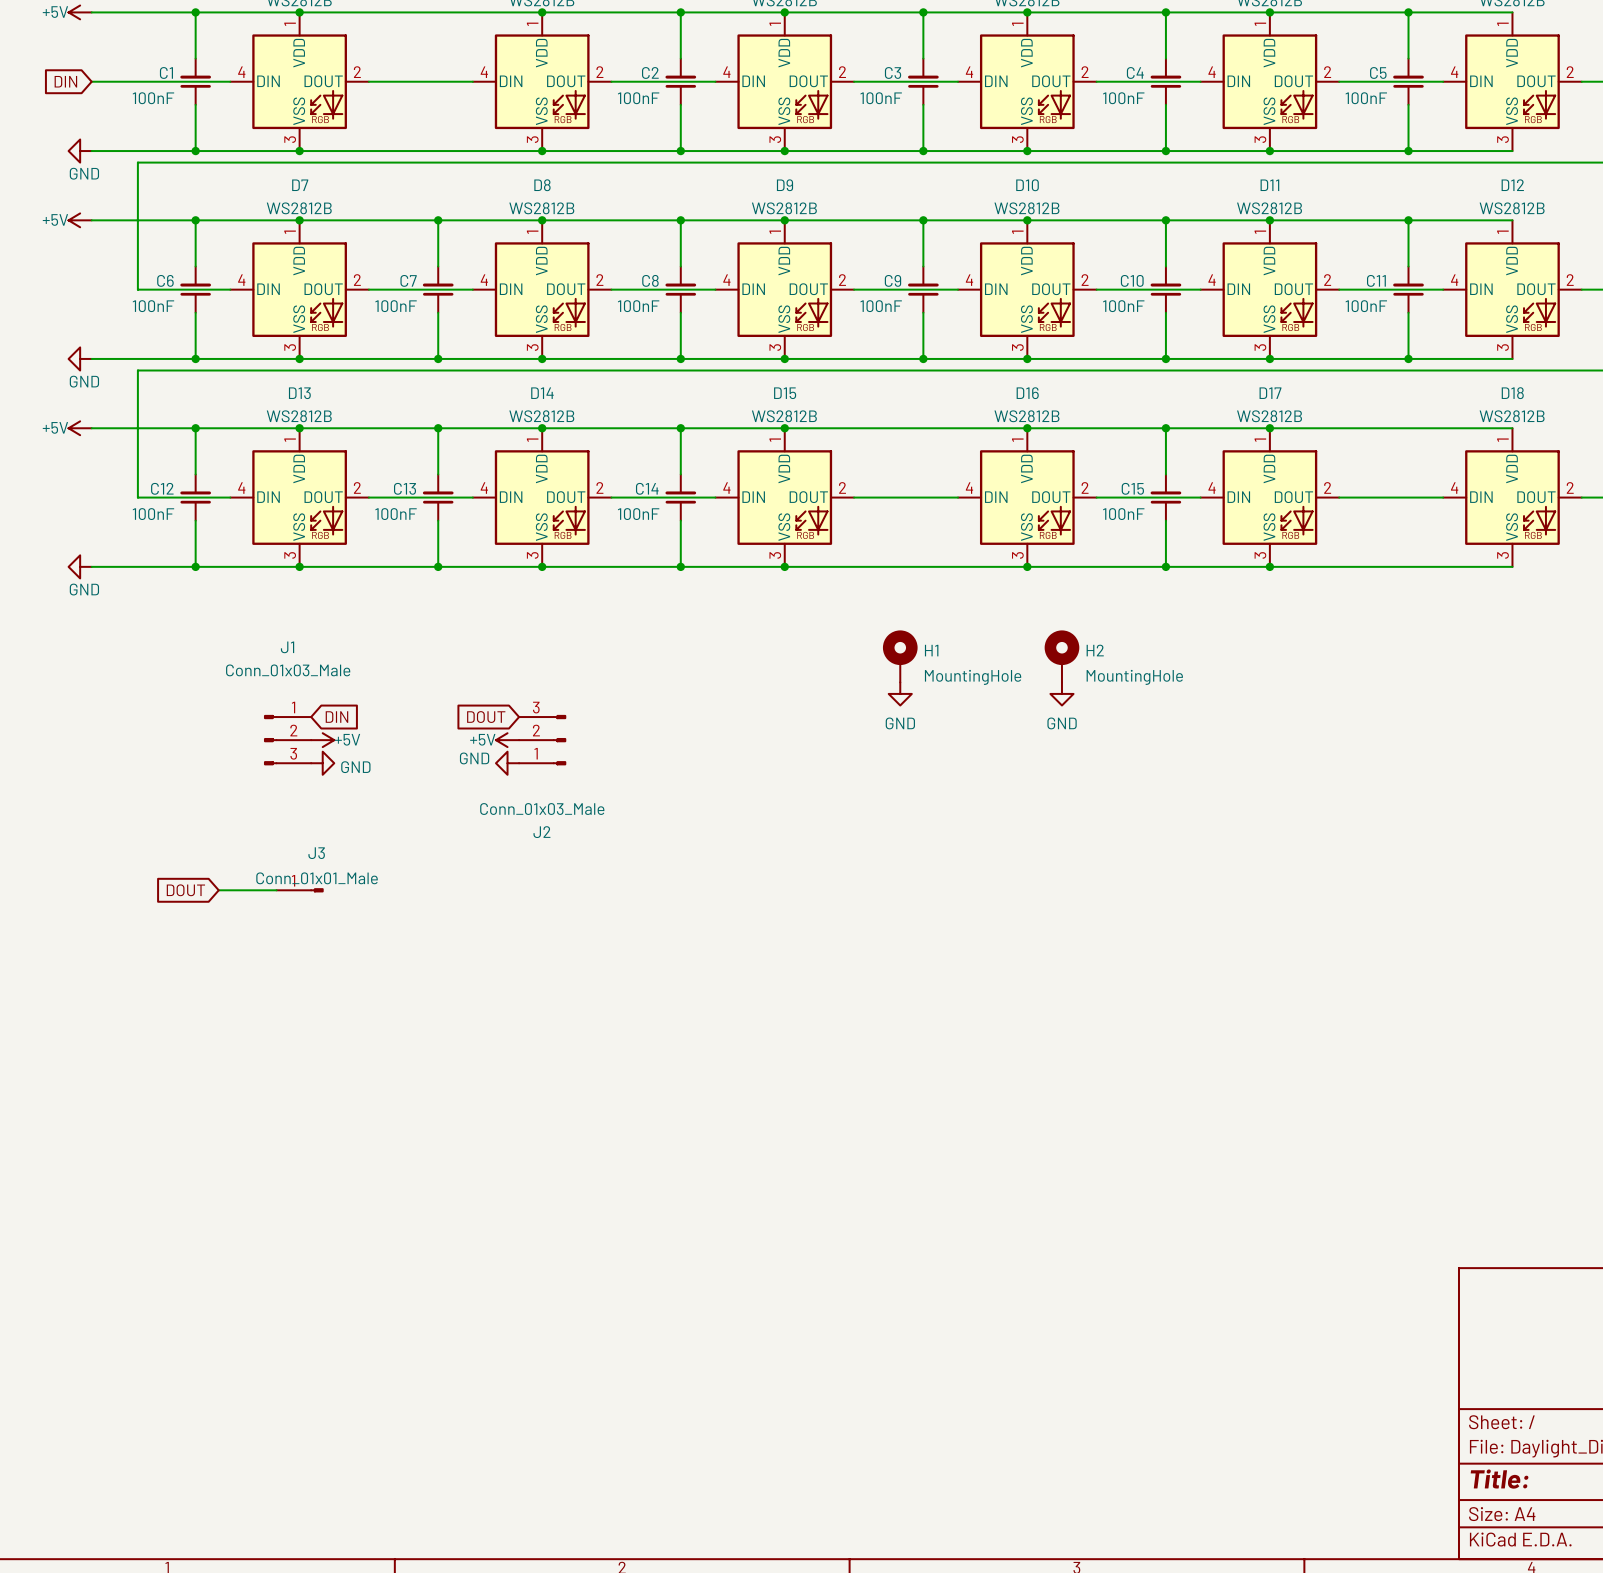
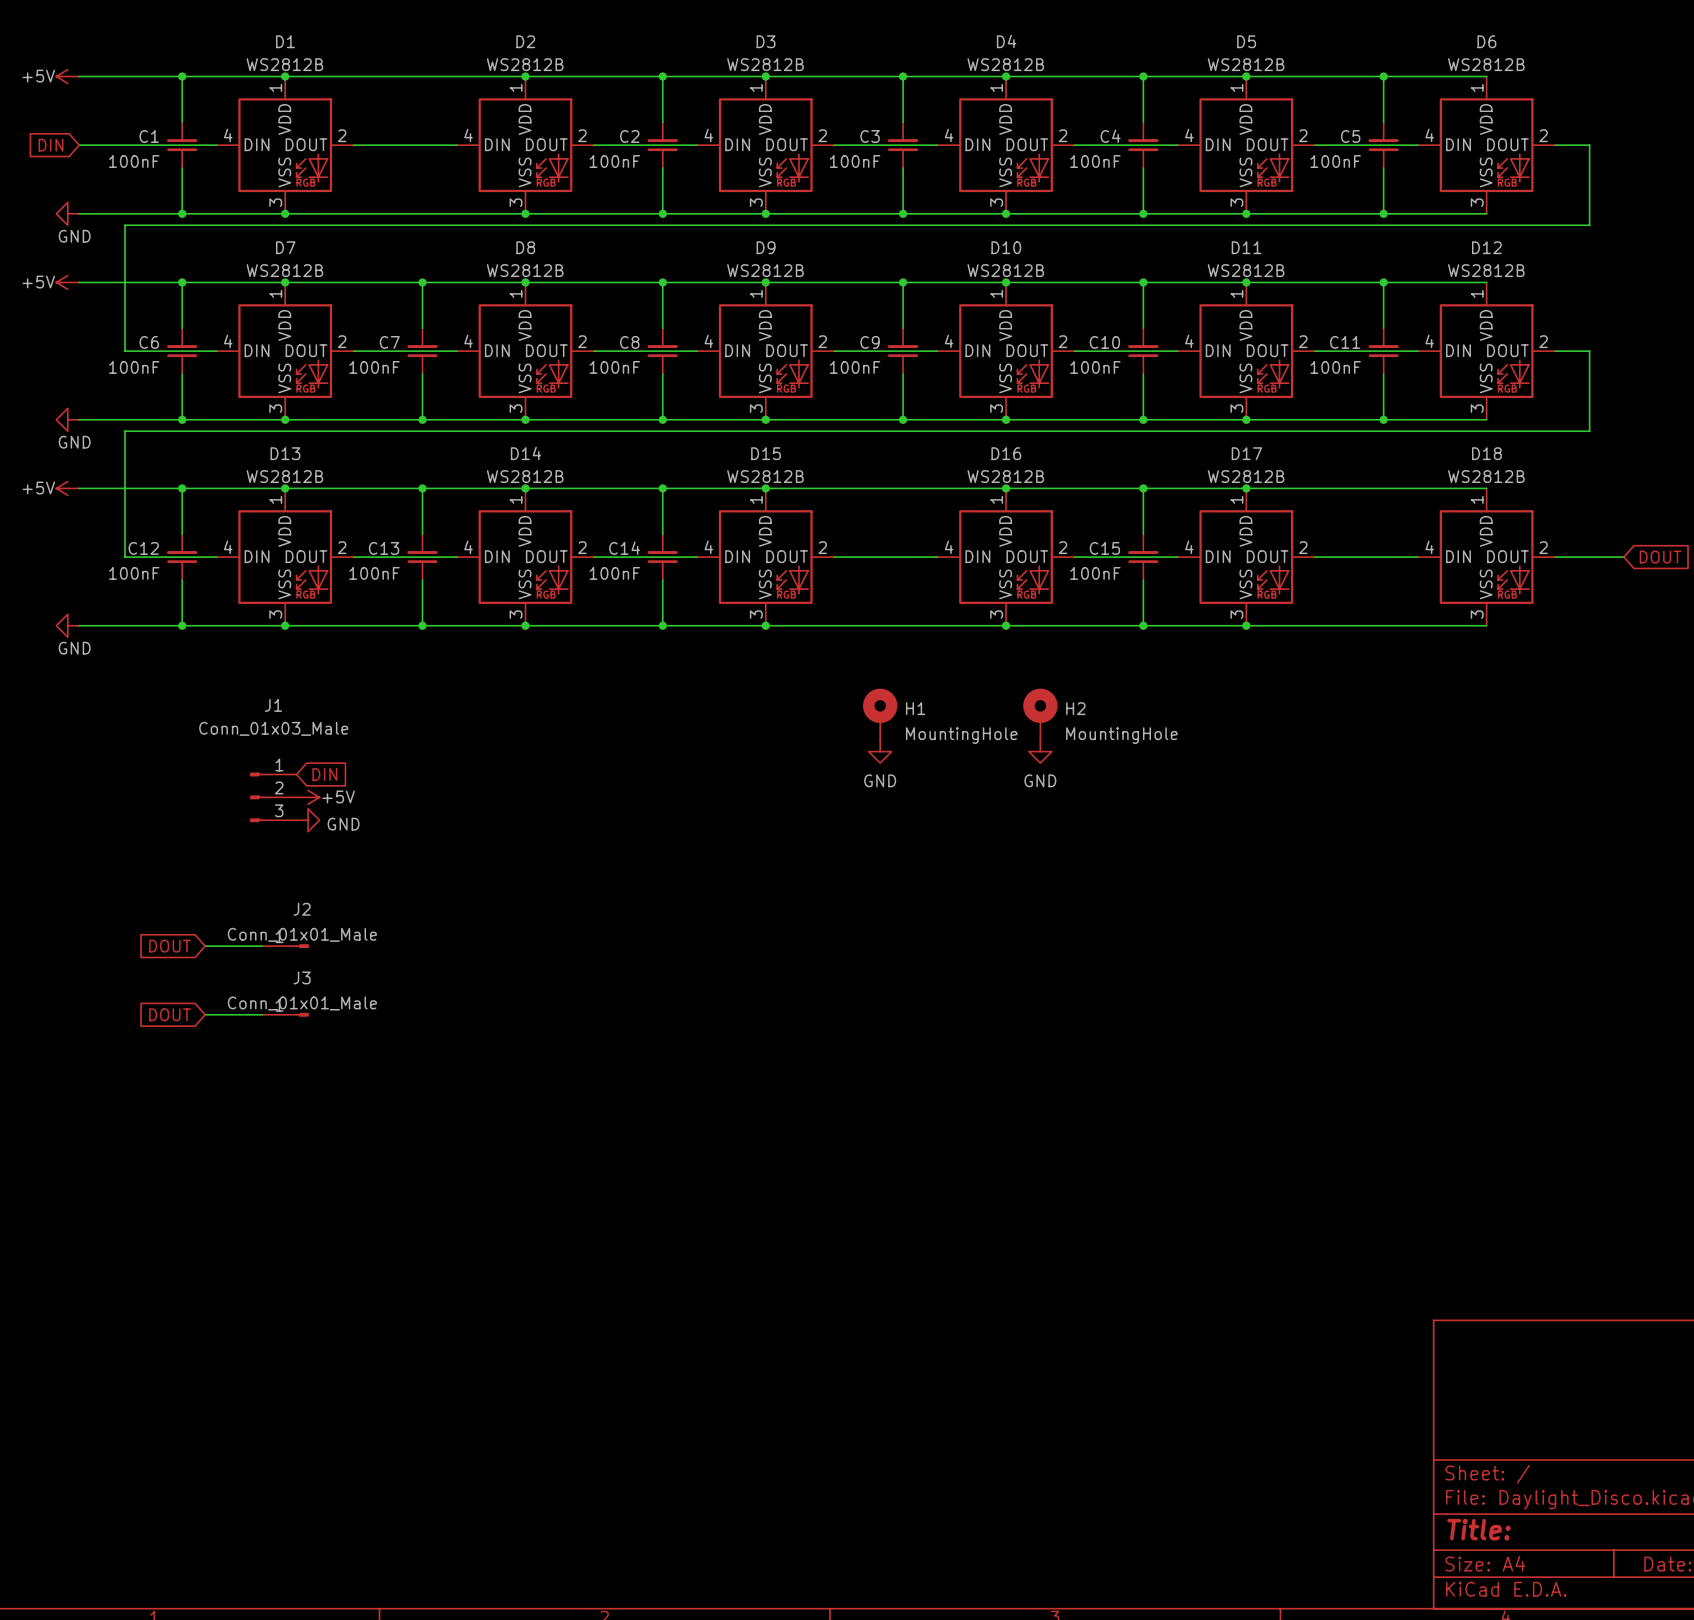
global label: DOUT (486, 717) -> none
power symbol: +5V (507, 740) -> none
J2: Conn_01x03_Male (542, 740) -> none
power symbol: GND (507, 763) -> none
J3 name: J3 (316, 853) -> J2 (302, 909)
global label: none -> DOUT (170, 1014)
wire: none -> (205, 1014) (262, 1014)
J3: none -> Conn_01x01_Male (285, 1014)

